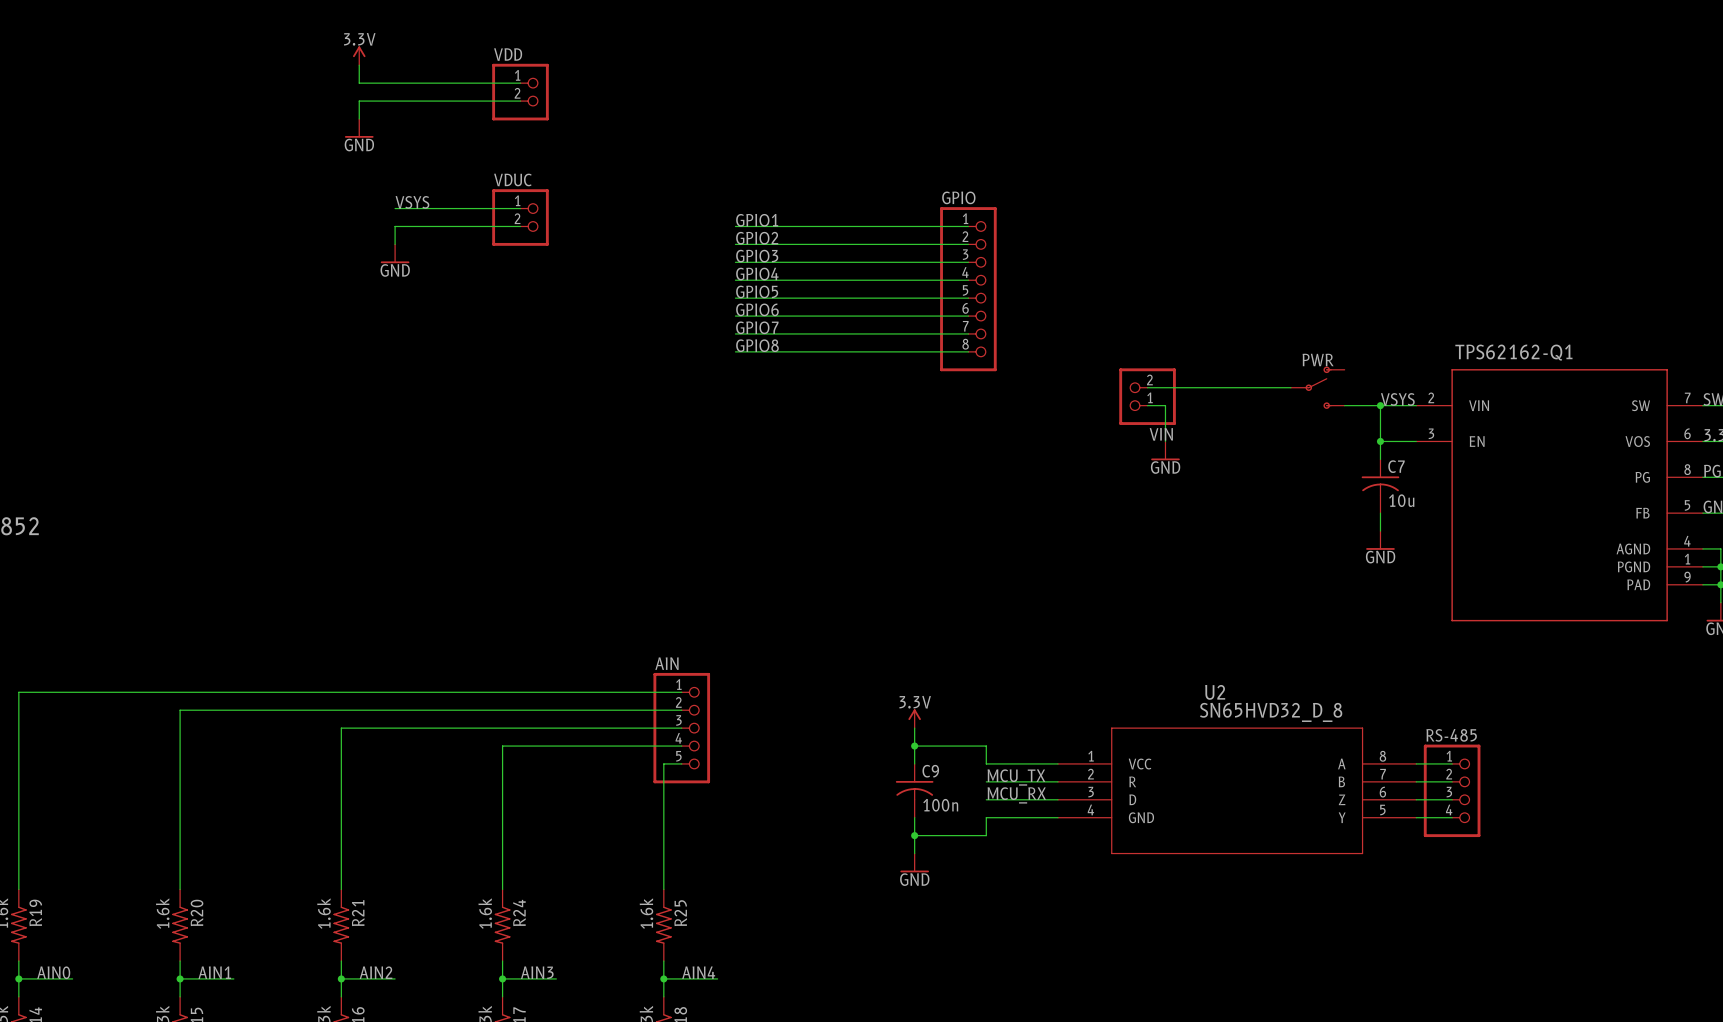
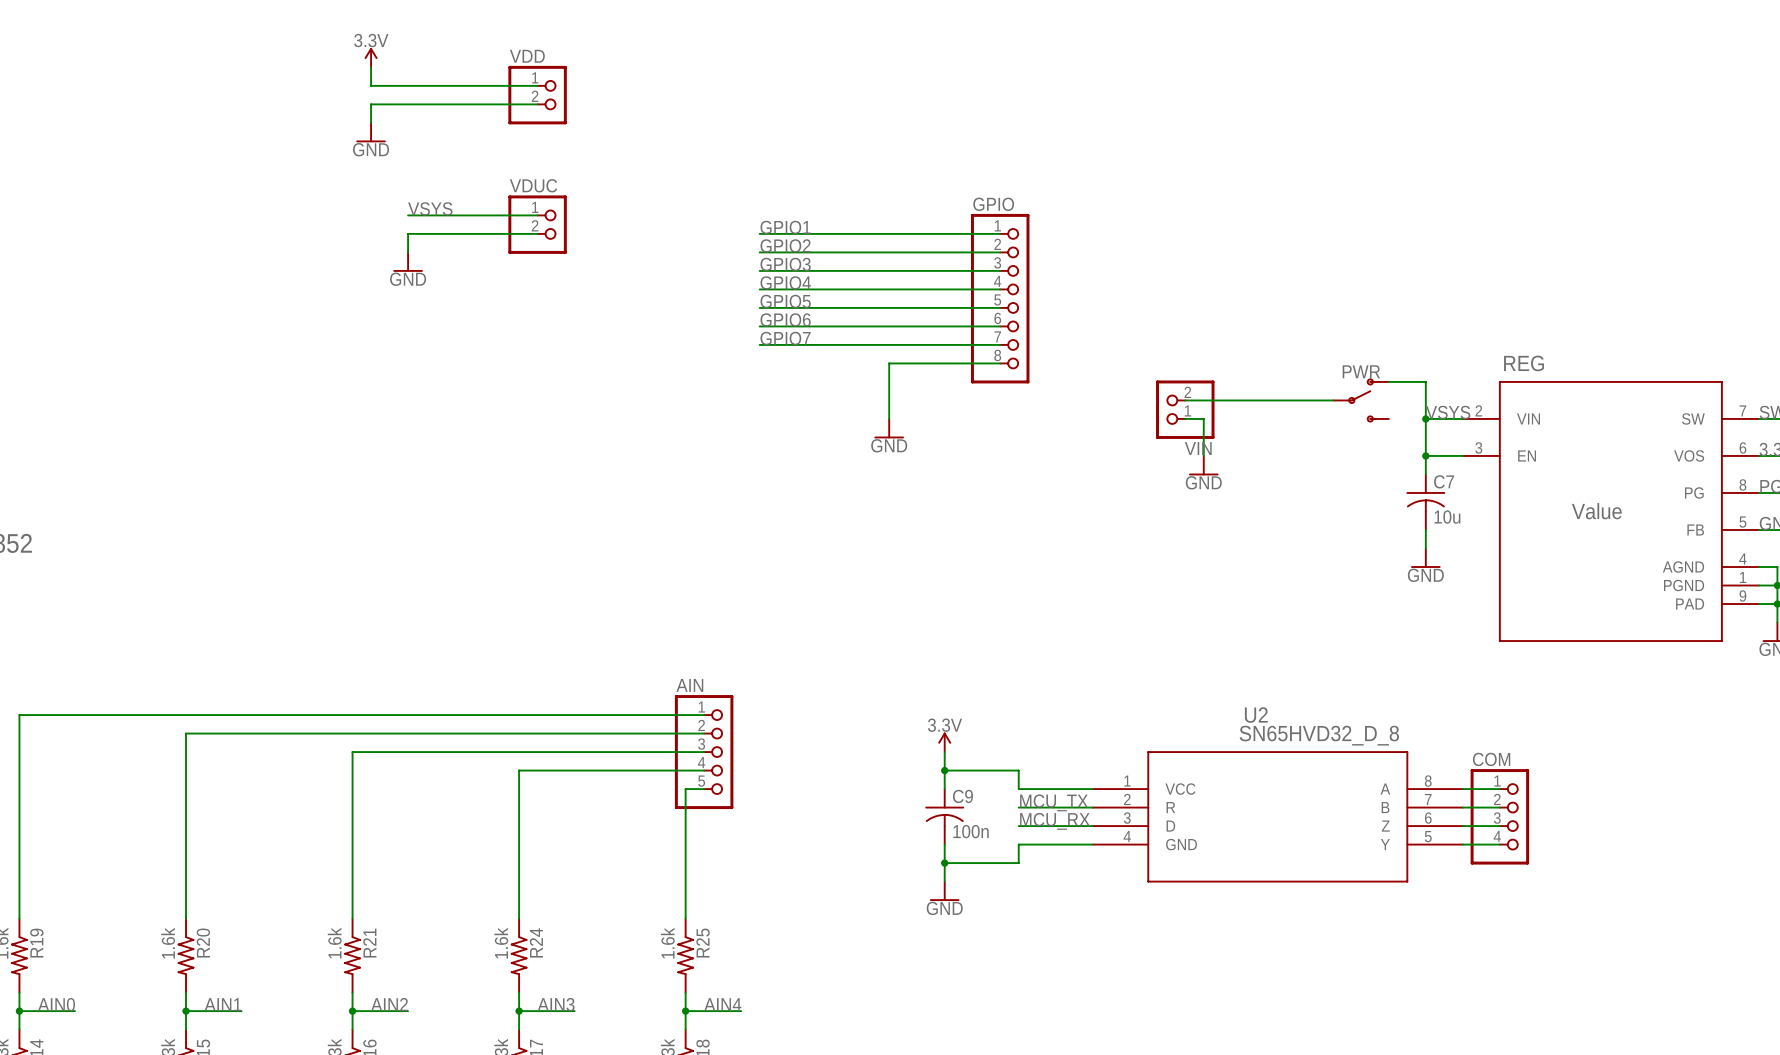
label: GPIO8 (757, 345) -> none
wire: (735, 351) (860, 351) -> (889, 418) (889, 363)
TPS62162-Q1 name: TPS62162-Q1 (1513, 352) -> REG (1524, 363)
wire: (1344, 405) (1380, 405) -> (1388, 381) (1425, 381) (1425, 418)
power symbol: none -> GND (889, 428)
TPS62162-Q1 value: none -> Value (1596, 511)
RS-485 name: RS-485 (1451, 735) -> COM (1491, 759)

